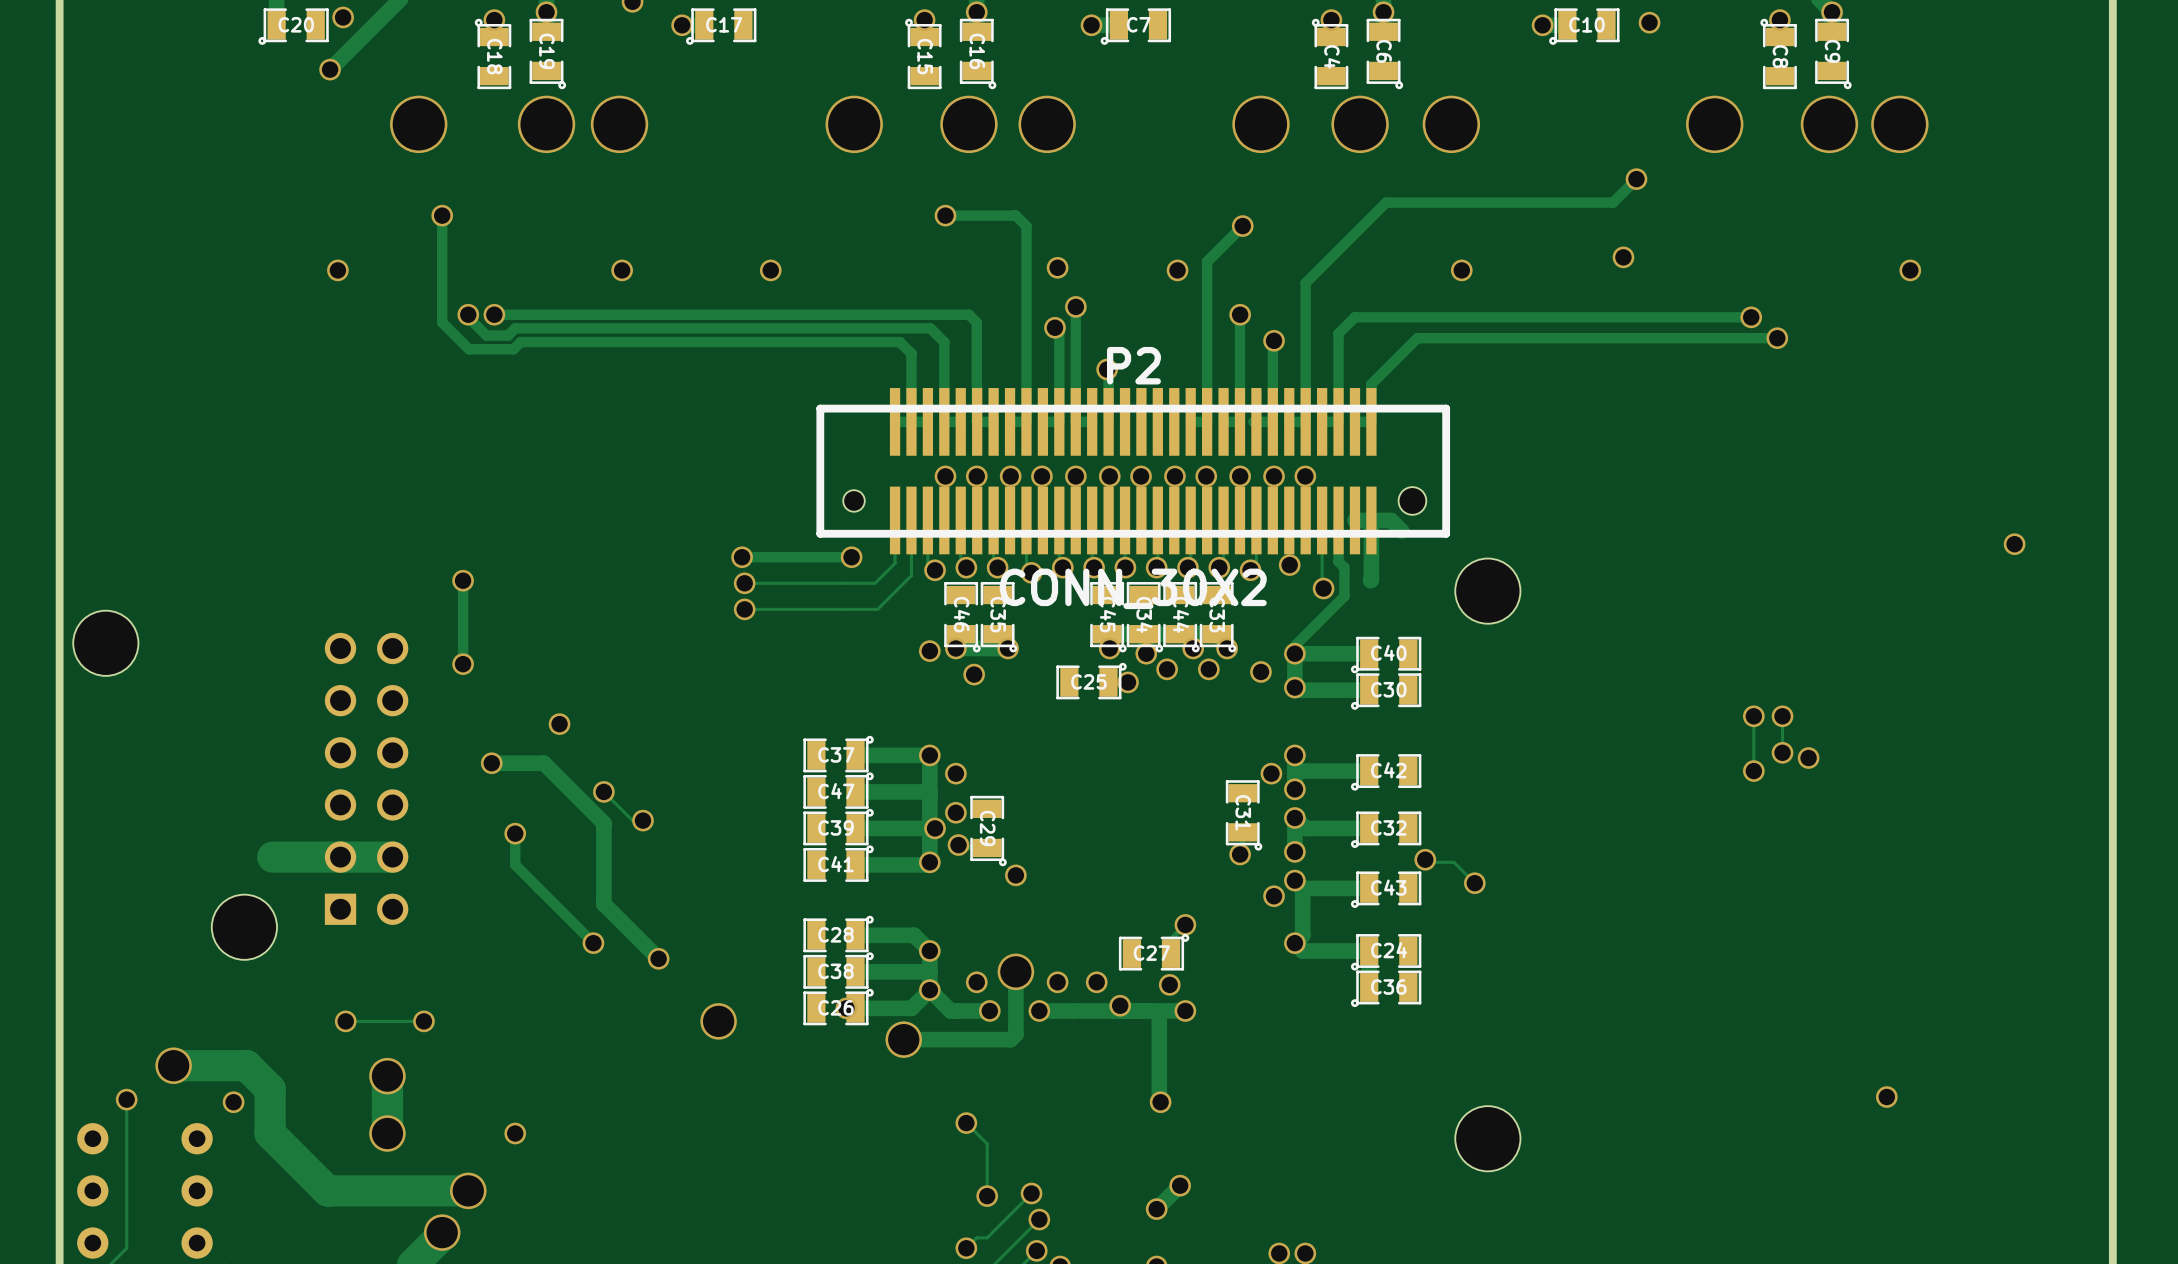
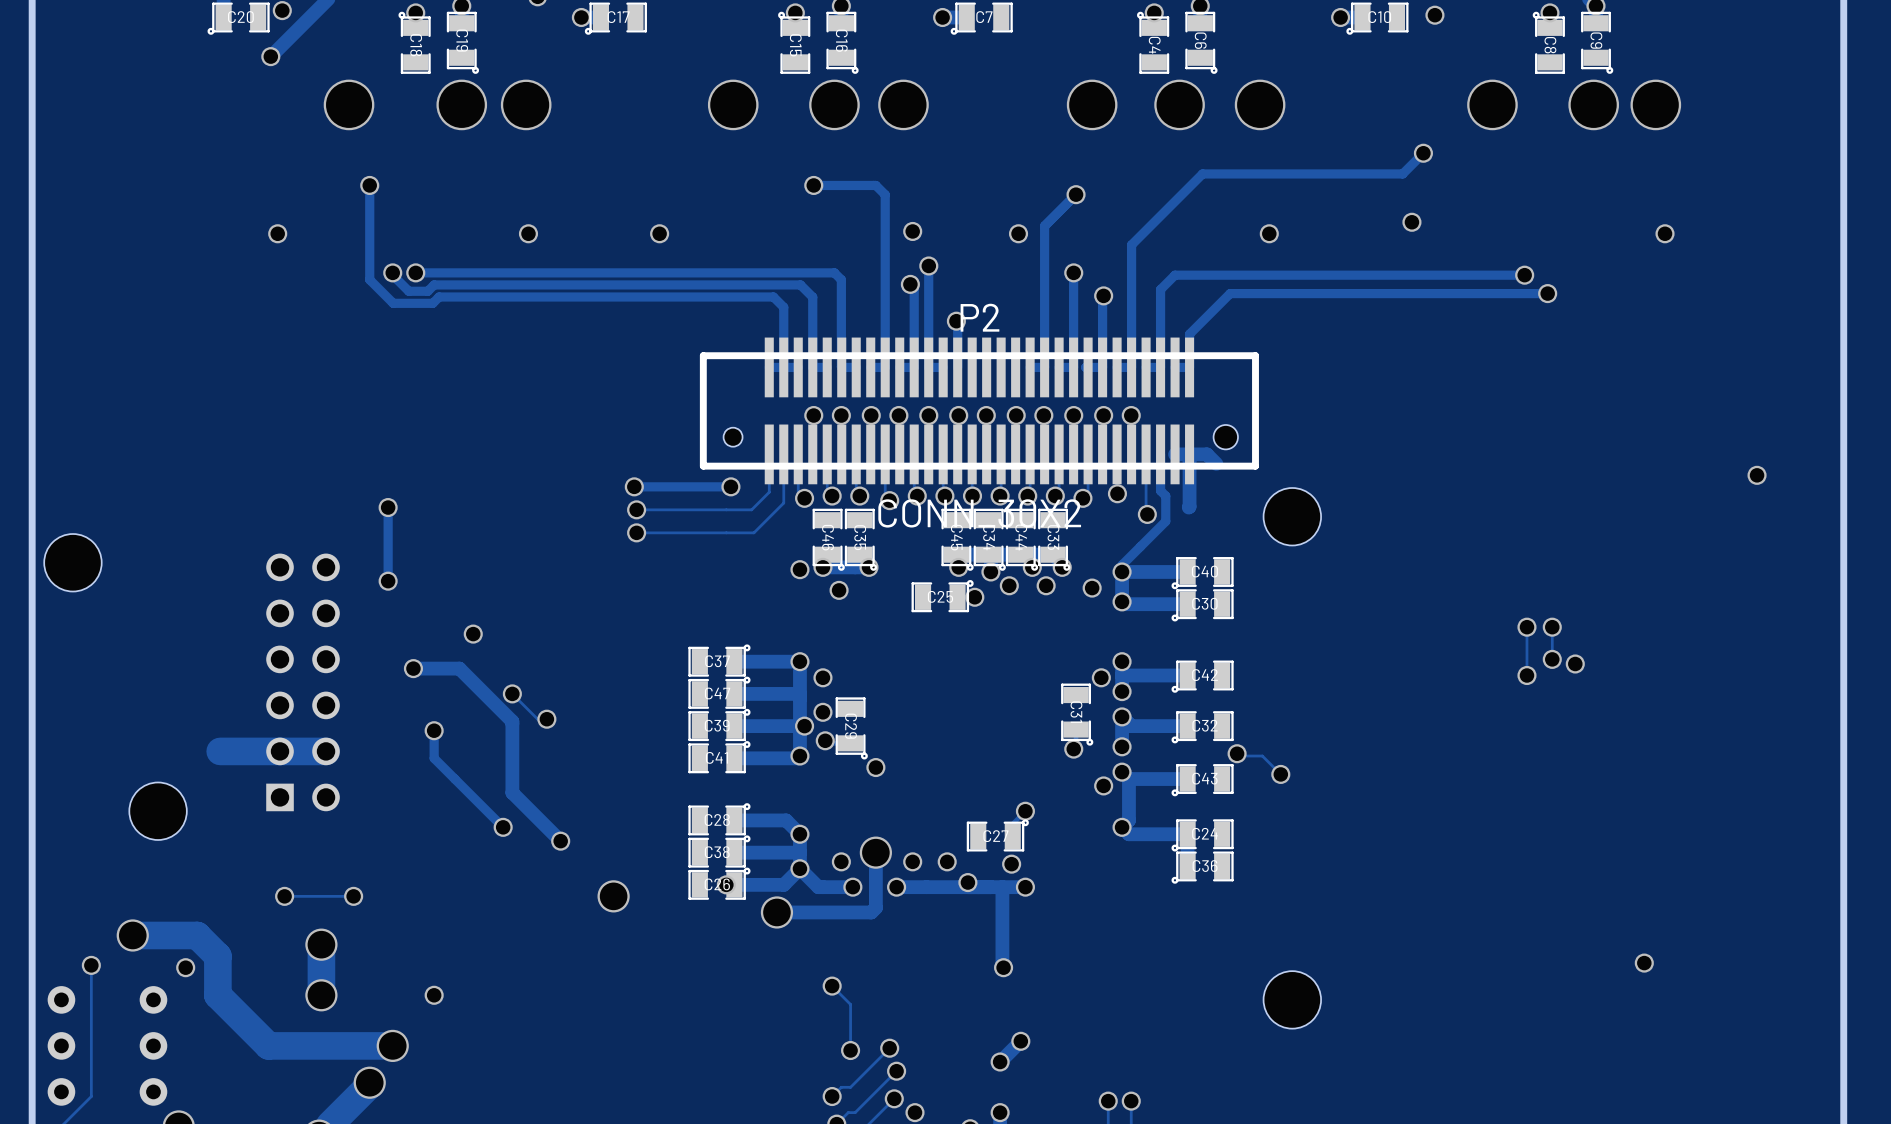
part position: (244, 927) -> (158, 811)

